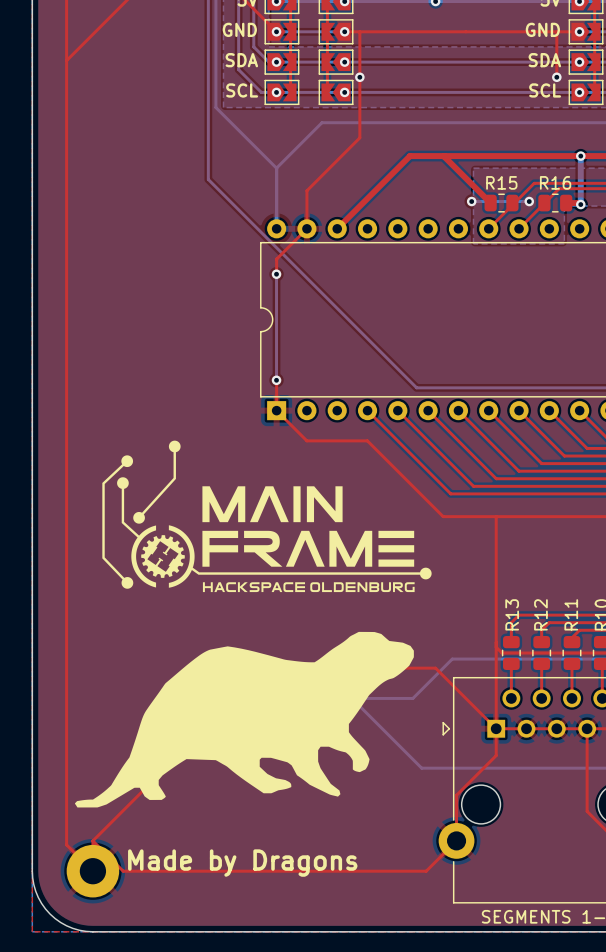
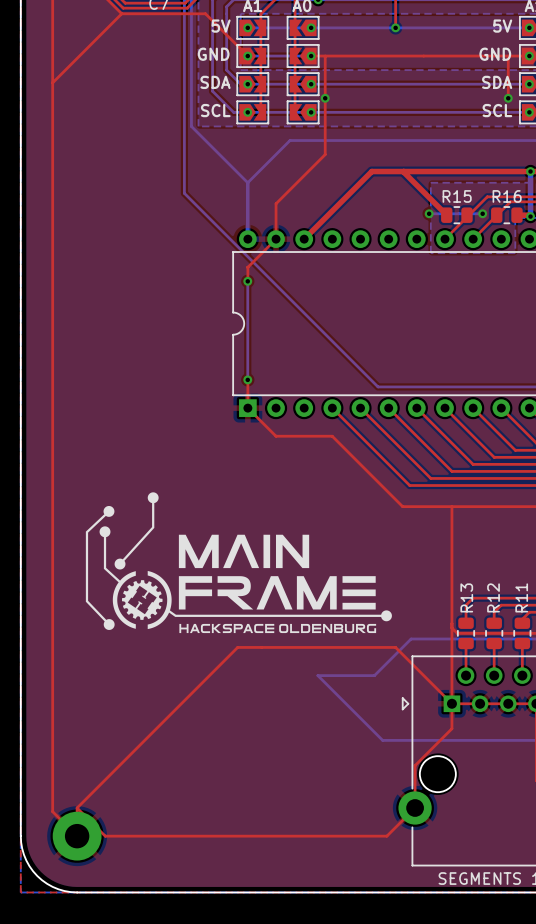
drawing position: (266, 516) -> (238, 562)
drawing: [74, 631, 414, 808] -> none
text: Made by Dragons (242, 863) -> none

